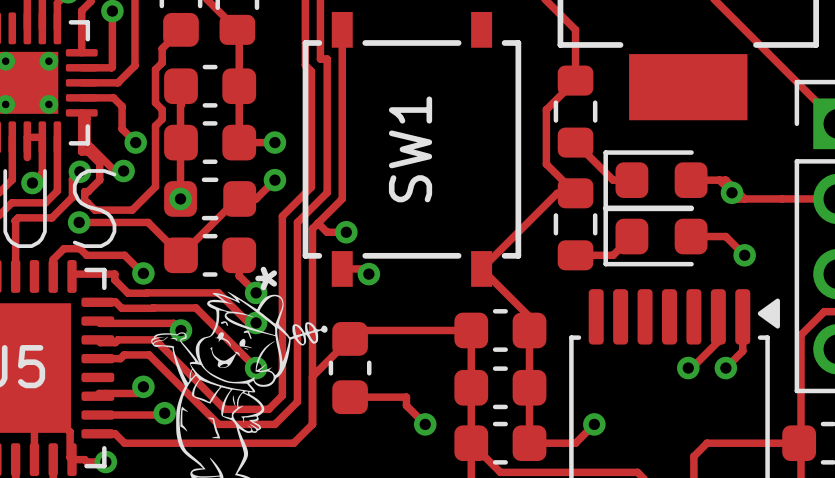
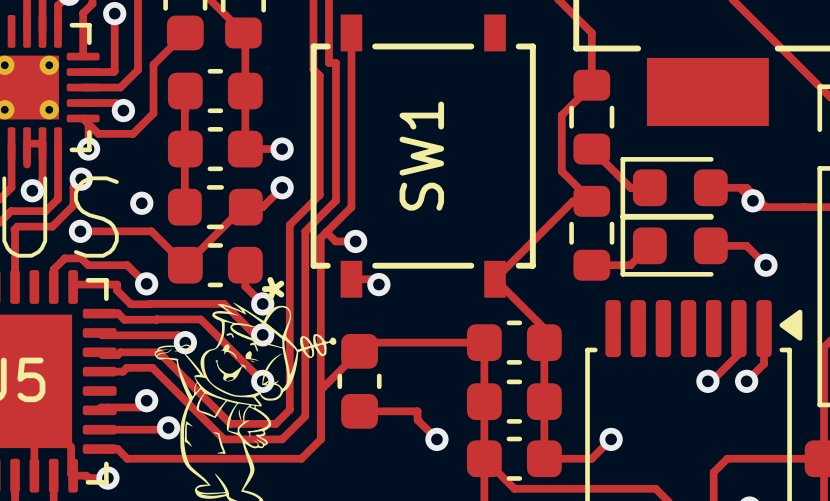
track: (162, 48) (162, 62) (155, 69) (155, 102) (162, 109) (162, 119) (155, 125) (155, 186) (132, 210) (94, 210) (87, 202) (84, 202) -> (165, 52) (153, 64) (153, 113) (133, 133) (98, 133) (88, 123)
track: (120, 105) (122, 128) (135, 142) -> none
via: none -> (123, 110)
track: (81, 112) (81, 151) (88, 151) (99, 163) (99, 180) (88, 191) (84, 191) (84, 202) -> none
via: none -> (88, 149)
via: (135, 142) -> none
track: (87, 143) (114, 171) (123, 171) -> none
via: (123, 171) -> none
via: none -> (141, 203)
via: (180, 198) -> none

